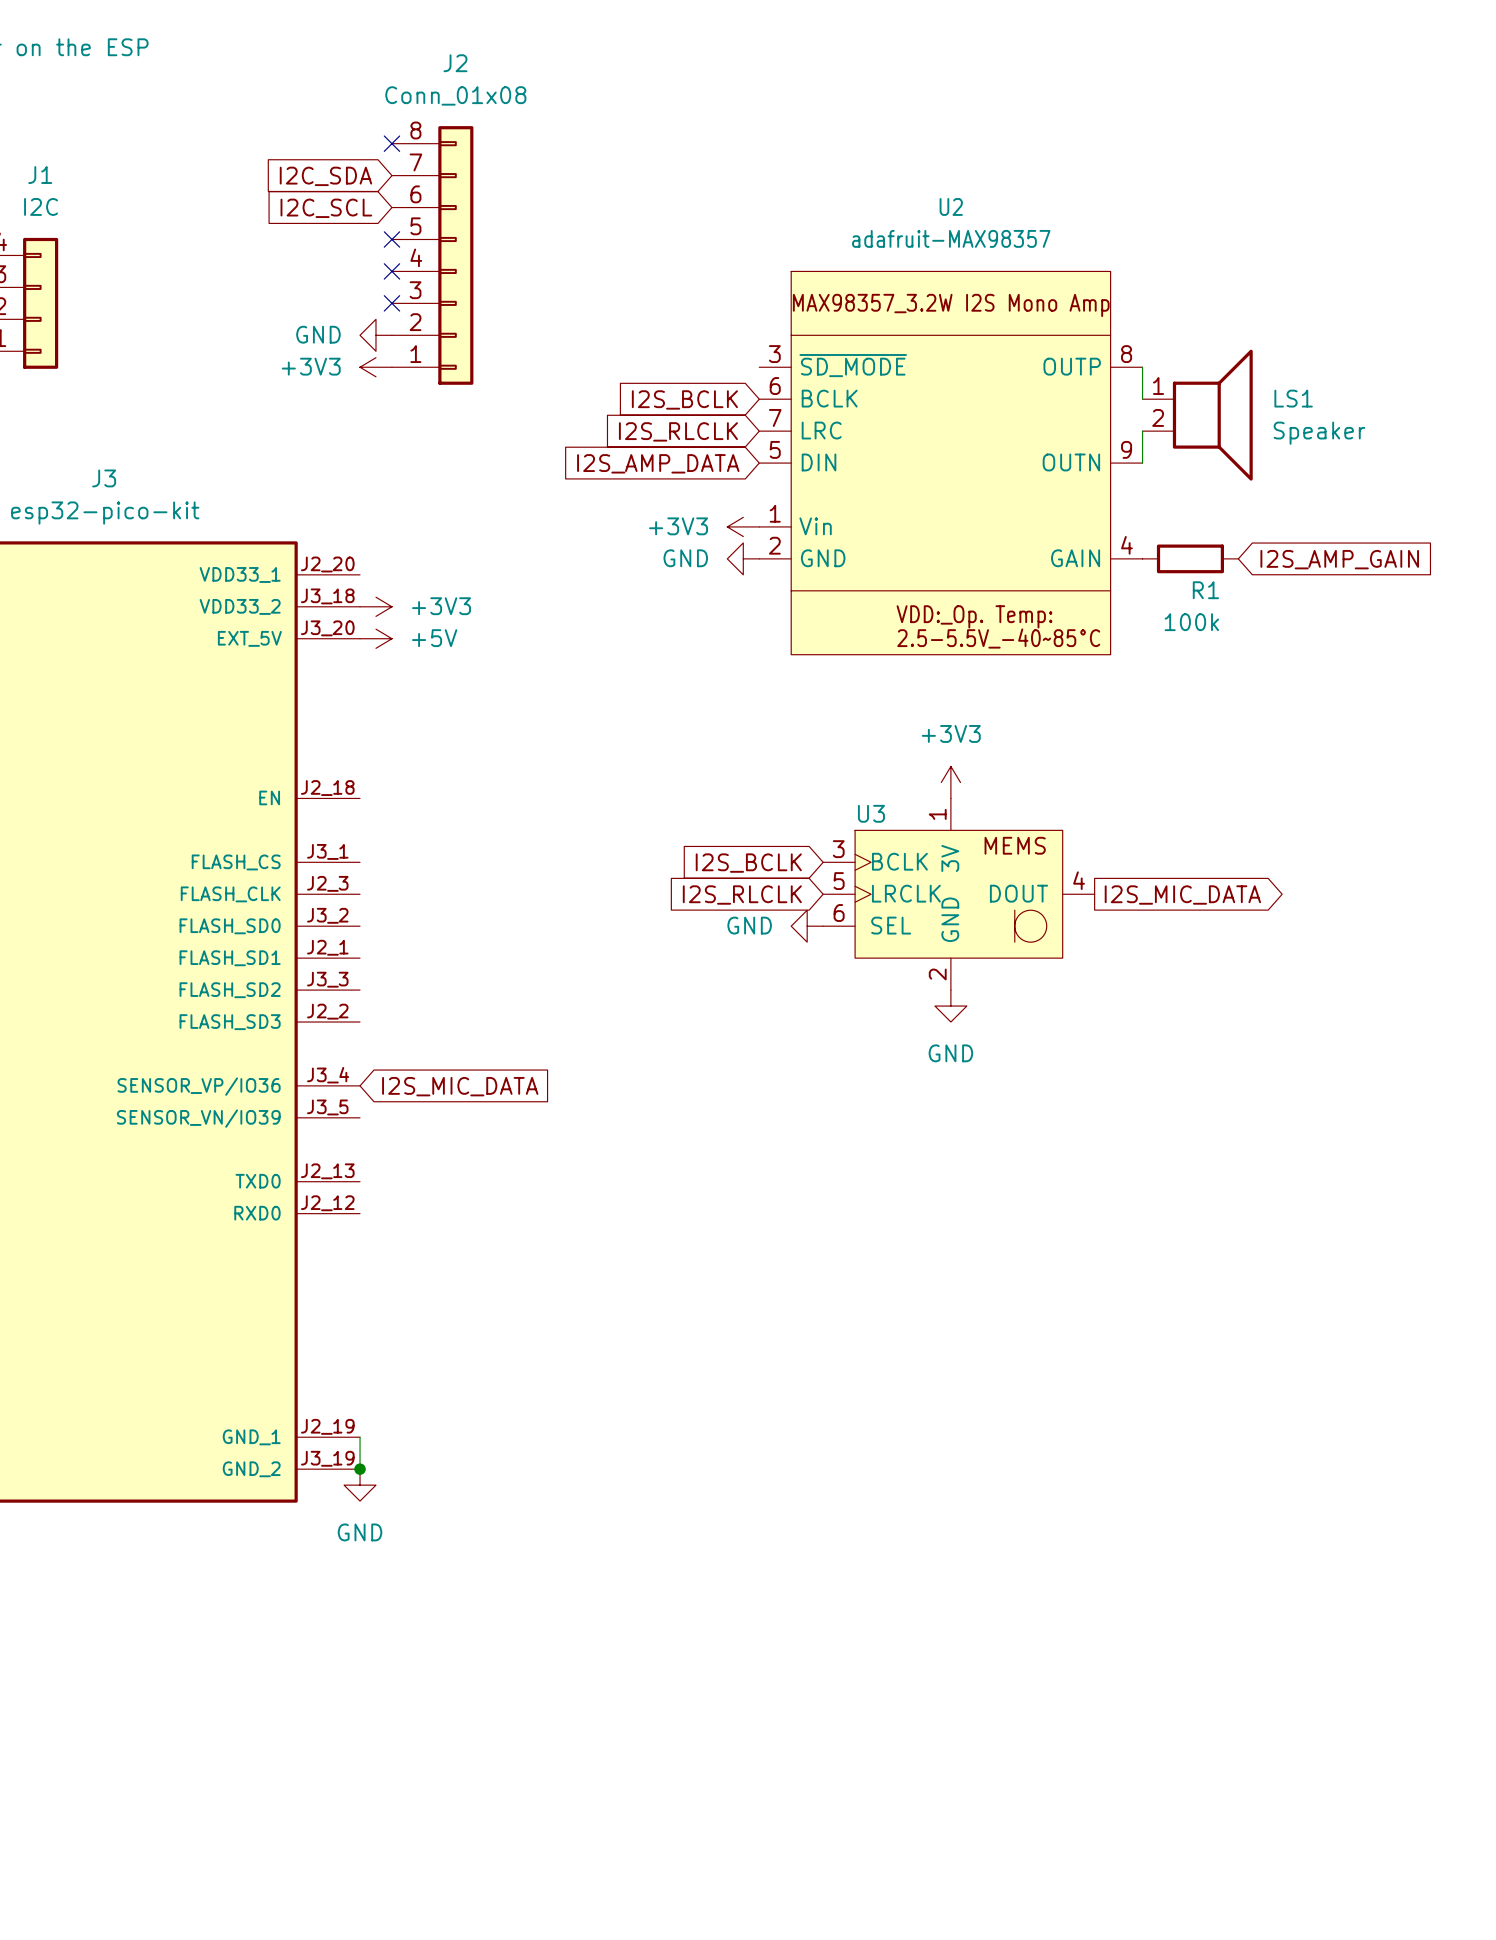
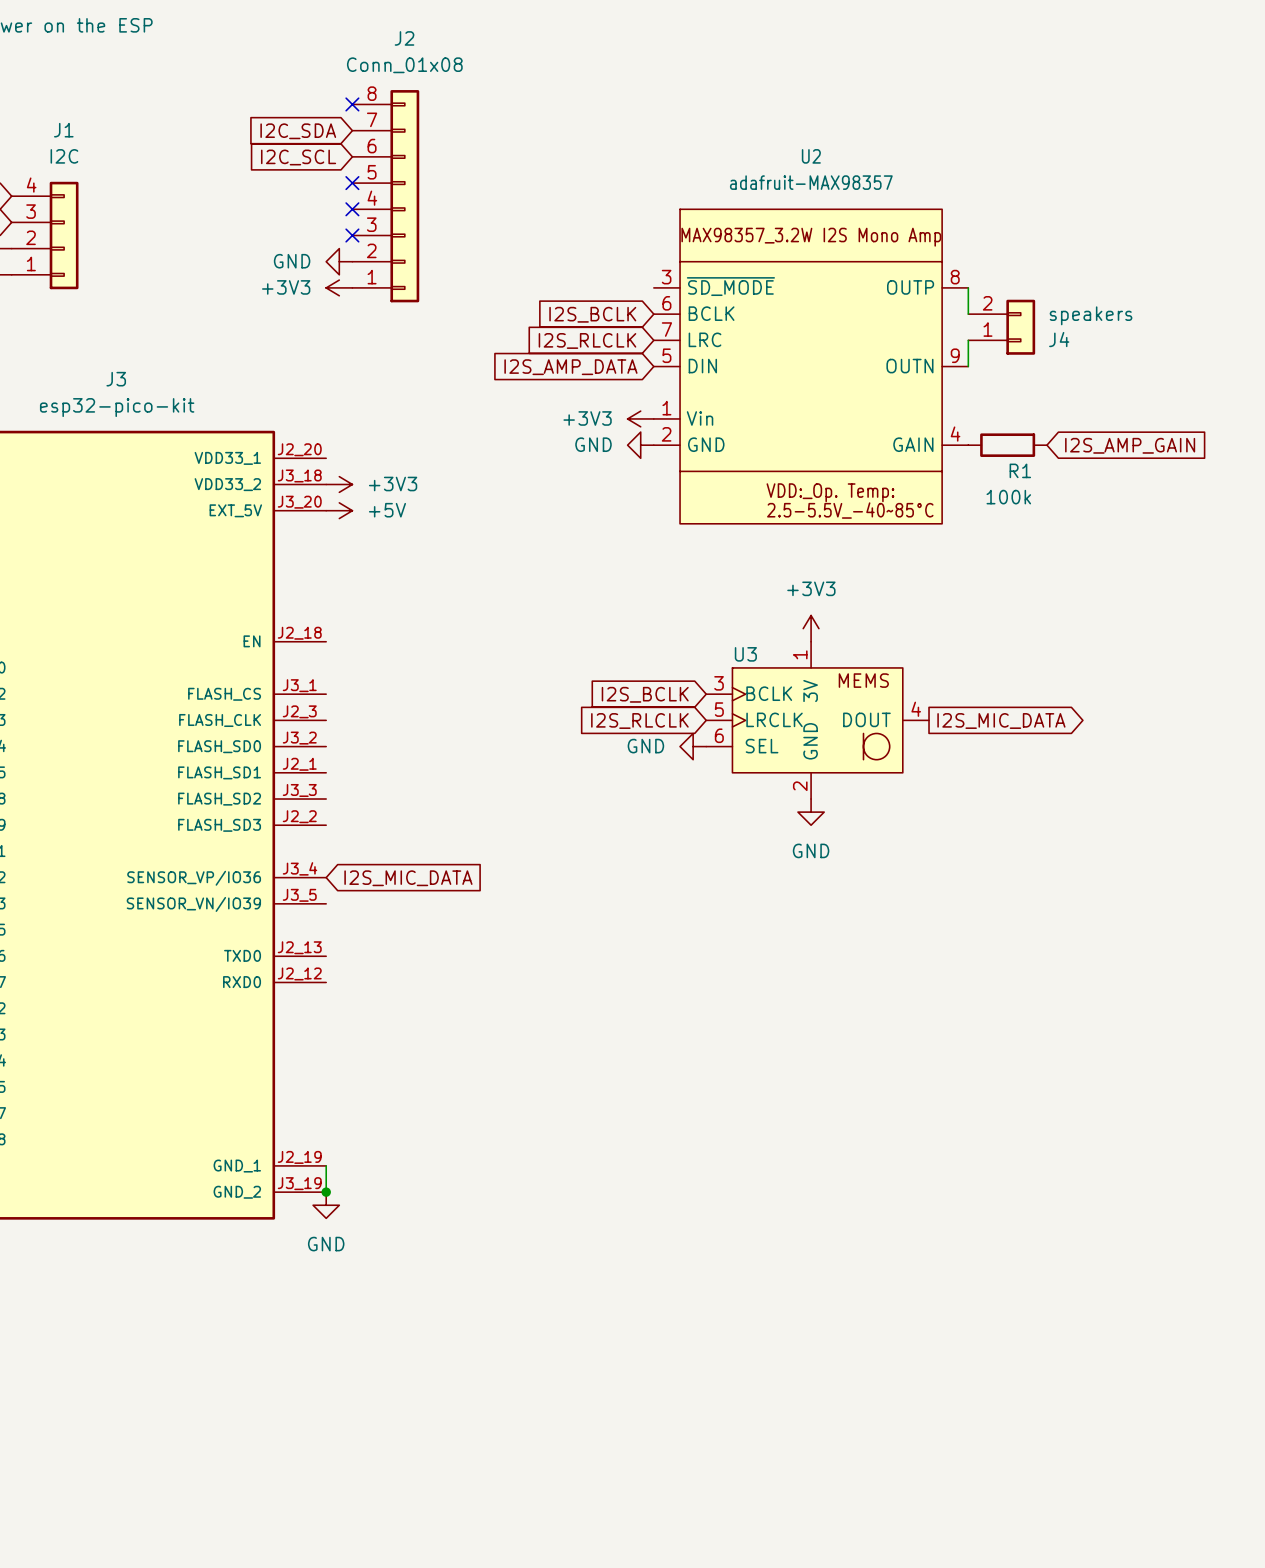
J4: none -> speakers (1001, 327)
LS1: Speaker (1197, 415) -> none

